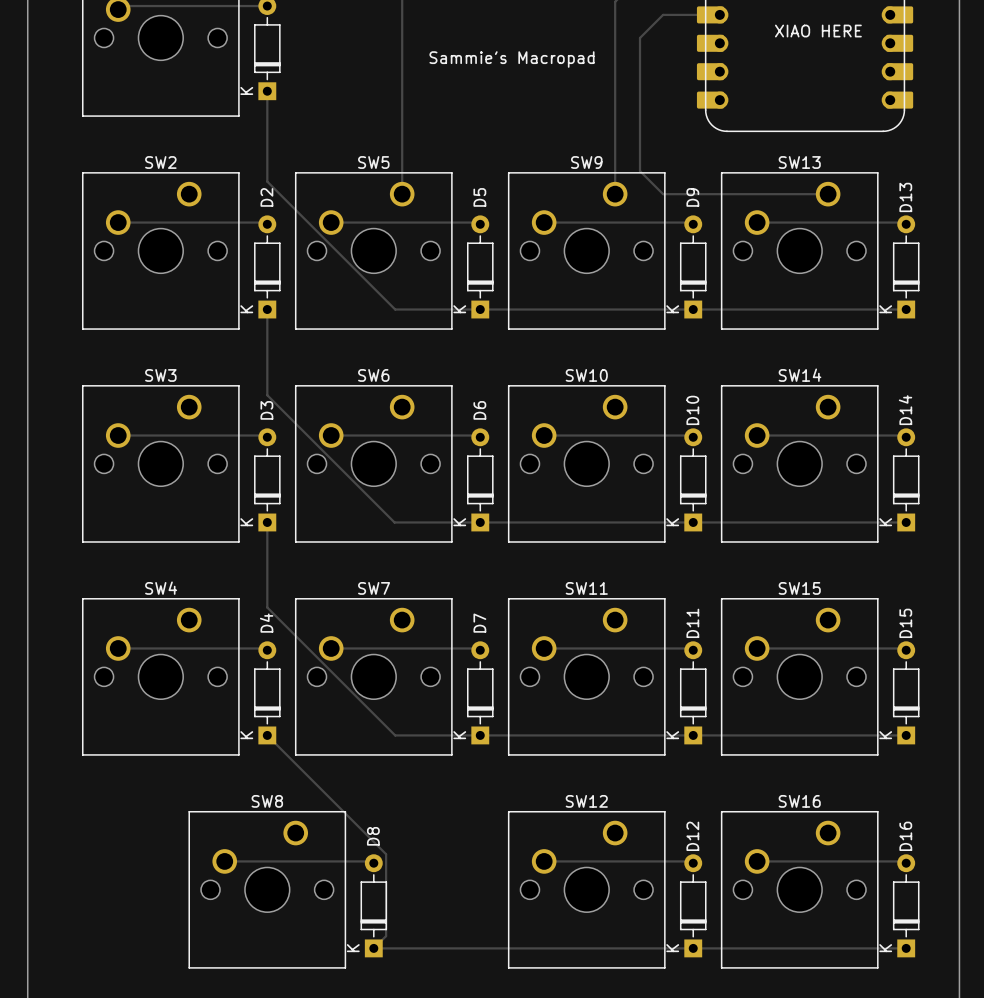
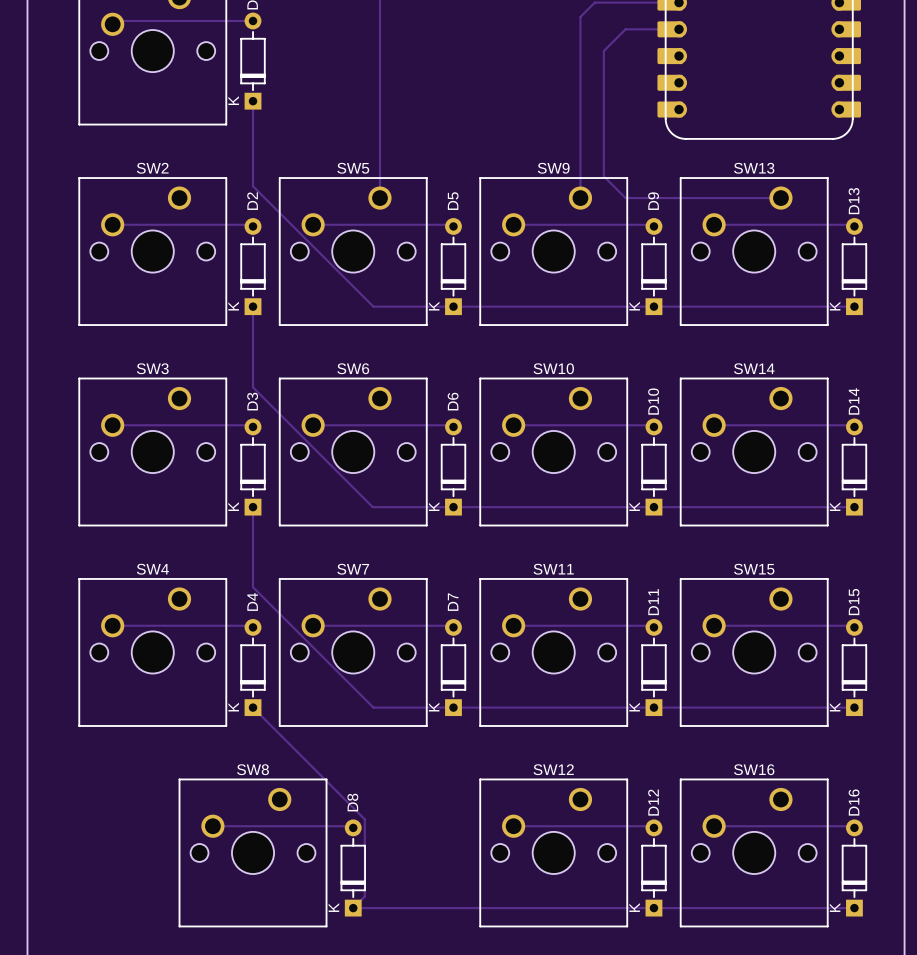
text: XIAO HERE (818, 31) -> none
text: Sammie's Macropad (511, 59) -> none

